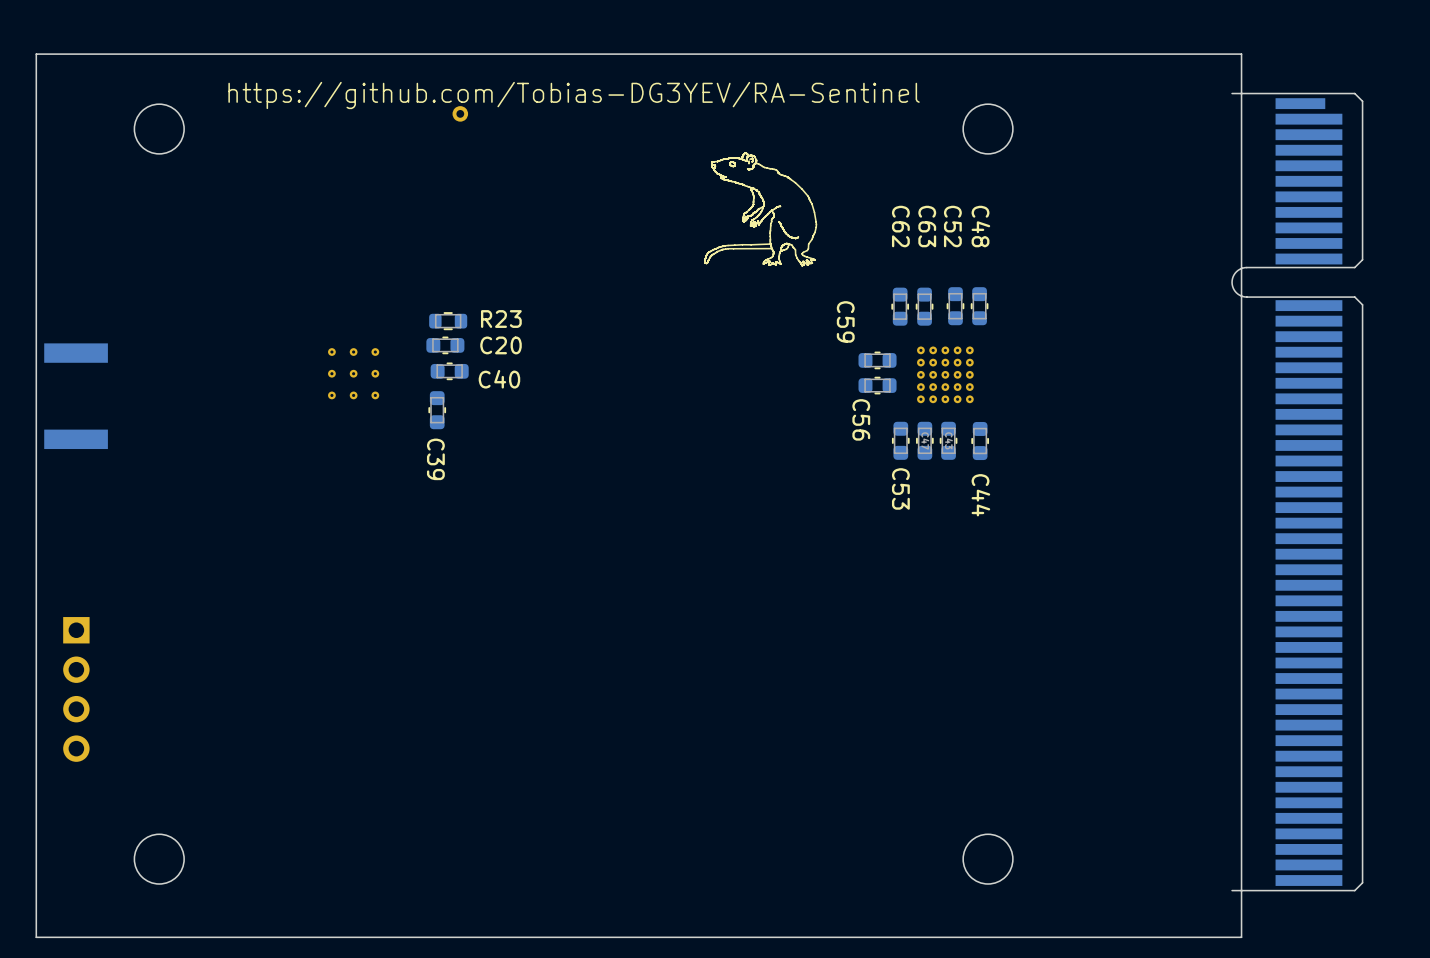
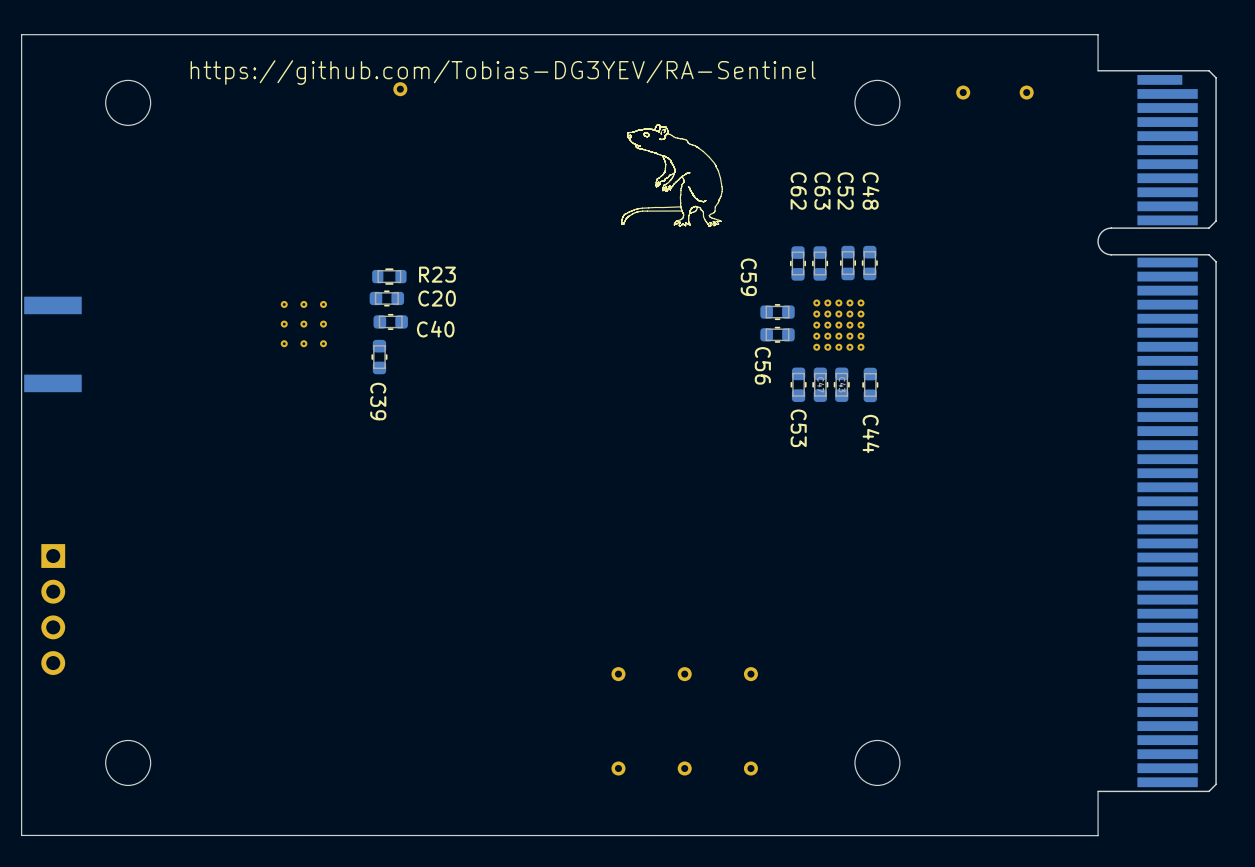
board edge: (1241, 54) (36, 54) (36, 937) (1241, 937) (1241, 54) -> none
board edge: none -> (1098, 70) (1098, 34) (21, 34) (21, 835) (1098, 835) (1098, 791)
part: none -> (963, 92)
part: none -> (1026, 92)
part: none -> (618, 674)
part: none -> (684, 674)
part: none -> (750, 674)
part: none -> (618, 768)
part: none -> (684, 768)
part: none -> (750, 768)

